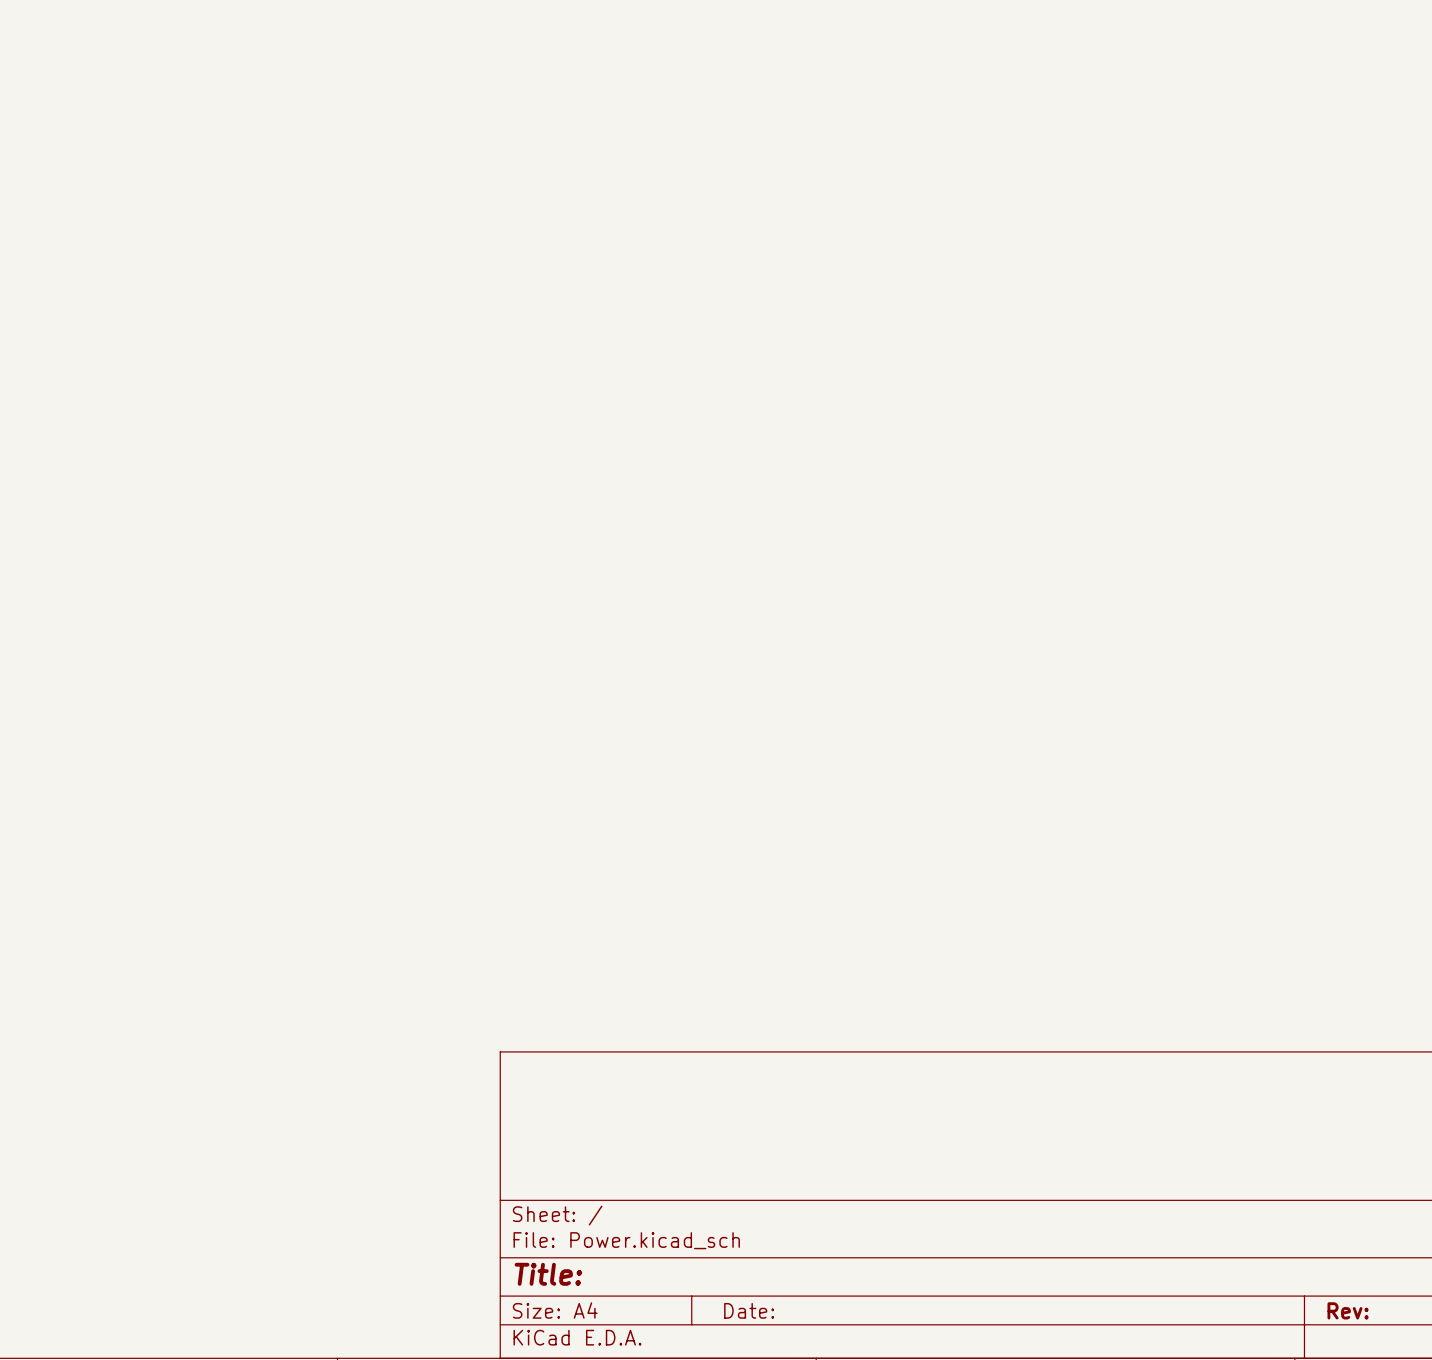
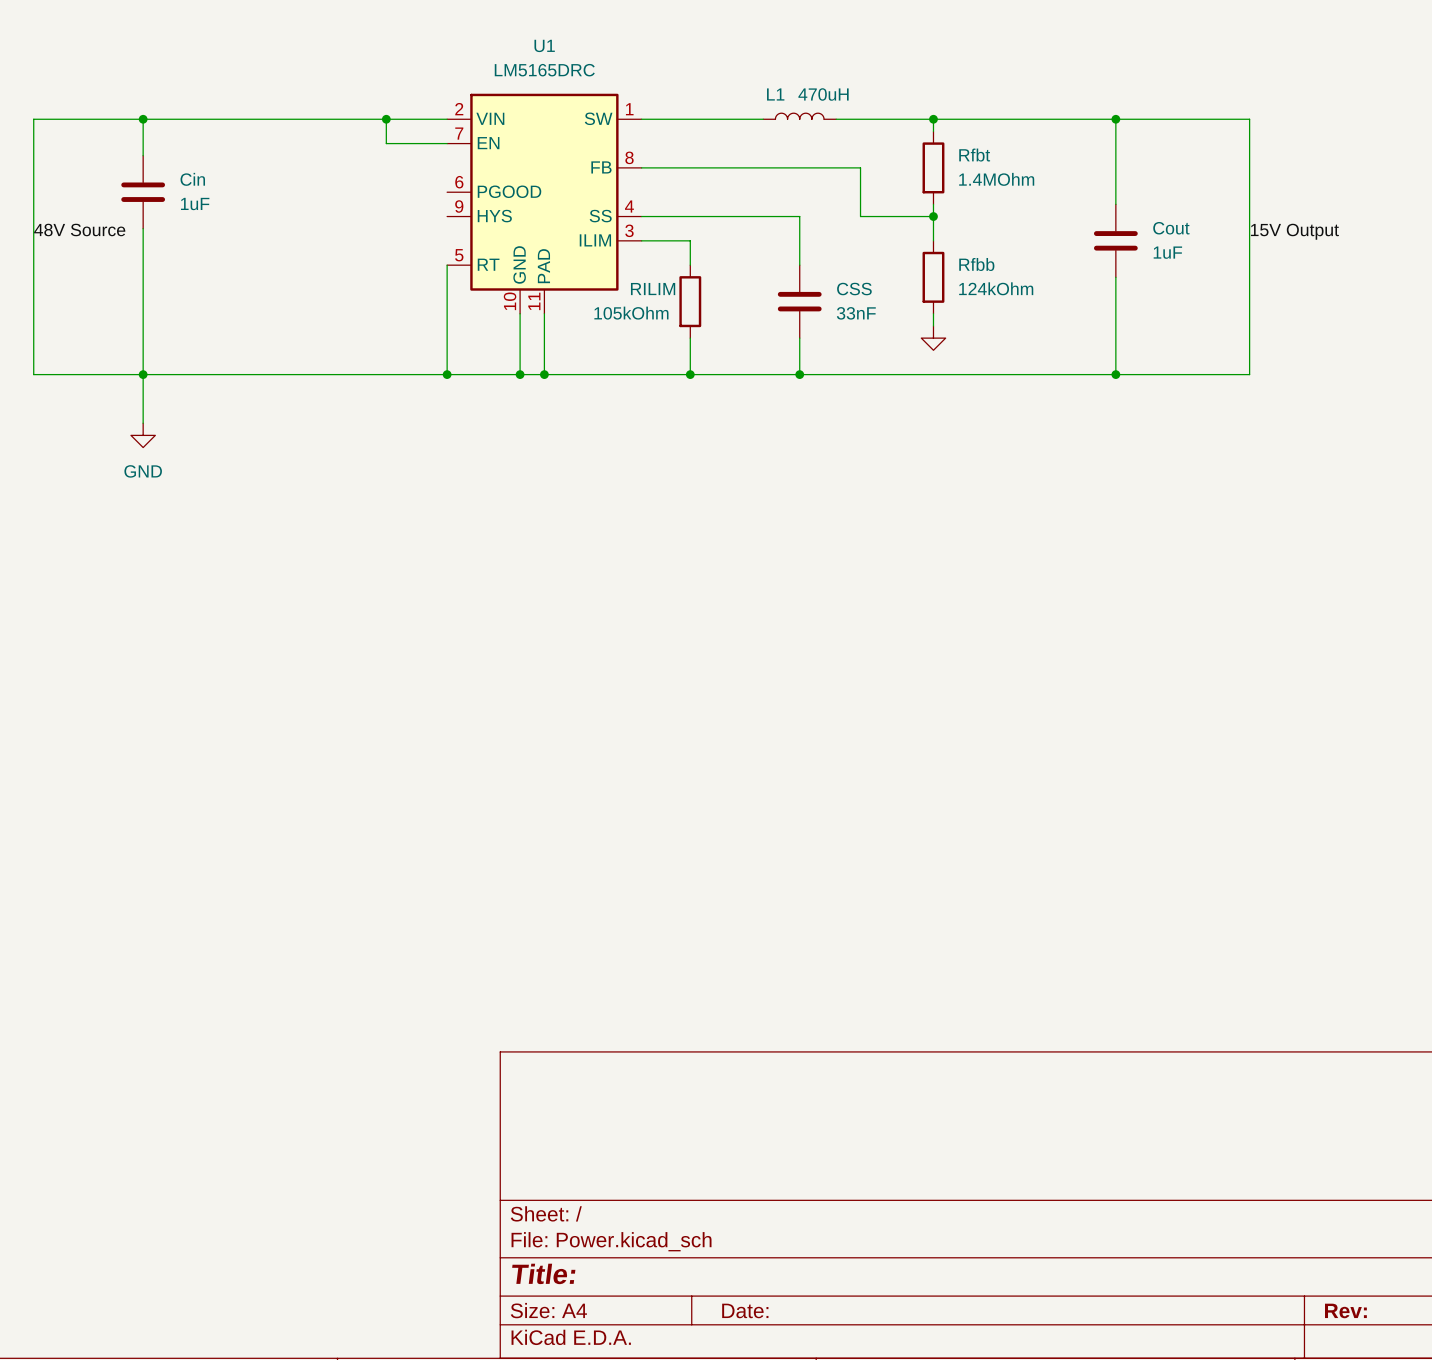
L1: none -> 470uH (799, 116)
wire: none -> (143, 119) (143, 155)
junction: none -> (143, 119)
wire: none -> (386, 119) (386, 143) (447, 143)
junction: none -> (386, 119)
wire: none -> (447, 119) (33, 119) (33, 374) (1249, 374) (1249, 119) (836, 119)
wire: none -> (641, 119) (763, 119)
wire: none -> (933, 119) (933, 131)
junction: none -> (933, 119)
wire: none -> (1115, 119) (1115, 204)
junction: none -> (1115, 119)
wire: none -> (641, 167) (860, 167) (860, 216) (933, 216)
Rfbt: none -> 1.4MOhm (933, 167)
Cin: none -> 1uF (143, 192)
U1: none -> LM5165DRC (544, 203)
wire: none -> (933, 204) (933, 240)
wire: none -> (641, 216) (799, 216) (799, 265)
junction: none -> (933, 216)
wire: none -> (143, 228) (143, 423)
label: none -> 48V Source (79, 230)
label: none -> 15V Output (1294, 231)
wire: none -> (641, 240) (690, 240) (690, 265)
Cout: none -> 1uF (1115, 240)
wire: none -> (447, 265) (447, 374)
Rfbb: none -> 124kOhm (933, 277)
wire: none -> (1115, 277) (1115, 374)
RILIM: none -> 105kOhm (690, 301)
CSS: none -> 33nF (799, 301)
wire: none -> (520, 313) (520, 374)
wire: none -> (544, 313) (544, 374)
wire: none -> (933, 313) (933, 325)
wire: none -> (690, 338) (690, 374)
wire: none -> (799, 338) (799, 374)
power symbol: none -> (933, 338)
junction: none -> (143, 374)
junction: none -> (447, 374)
junction: none -> (520, 374)
junction: none -> (544, 374)
junction: none -> (690, 374)
junction: none -> (799, 374)
junction: none -> (1115, 374)
power symbol: none -> GND (143, 435)

